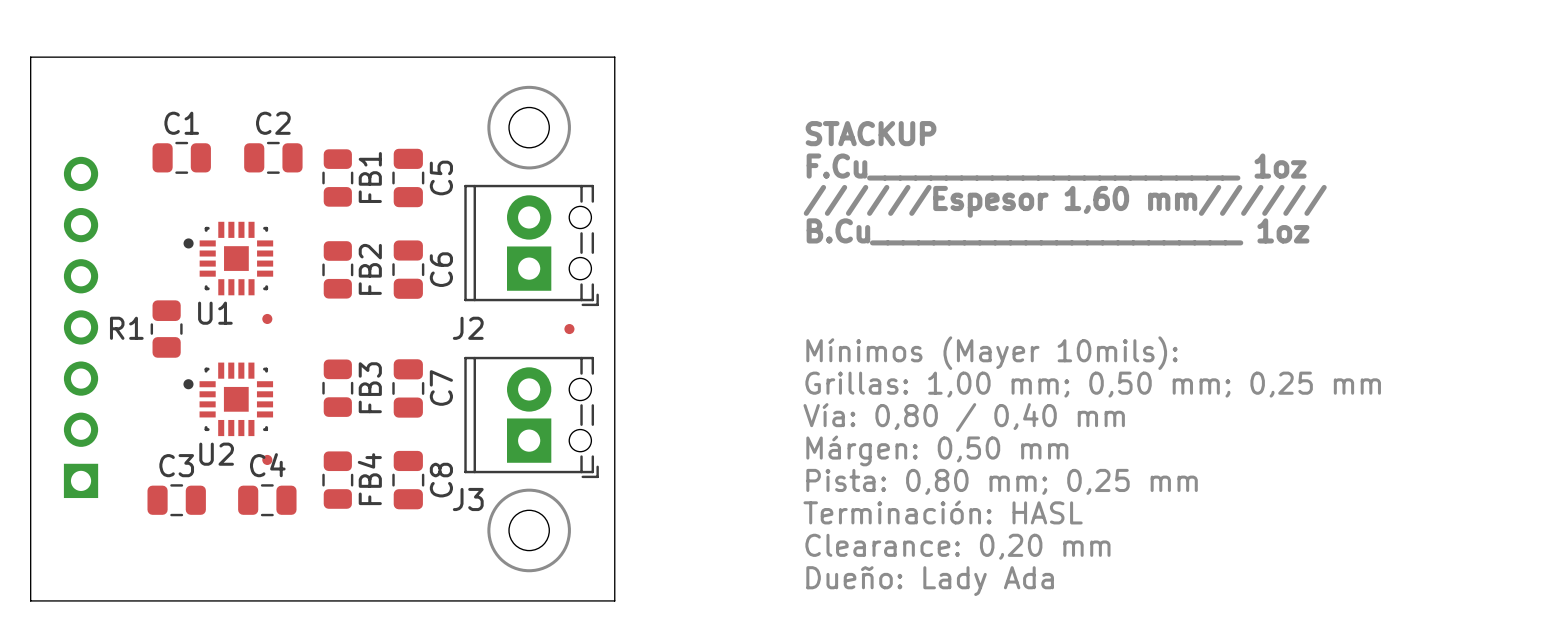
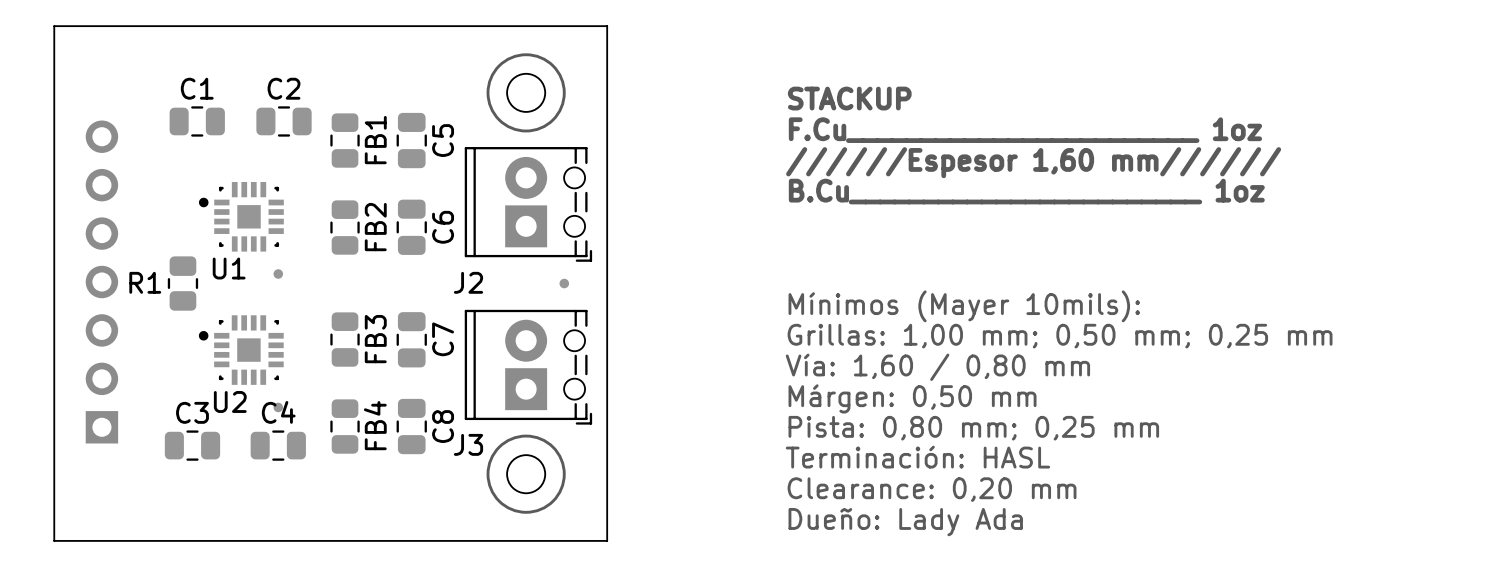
text: Vía: 0,80 / 0,40 mm (964, 417) -> Vía: 1,60 / 0,80 mm (937, 367)

